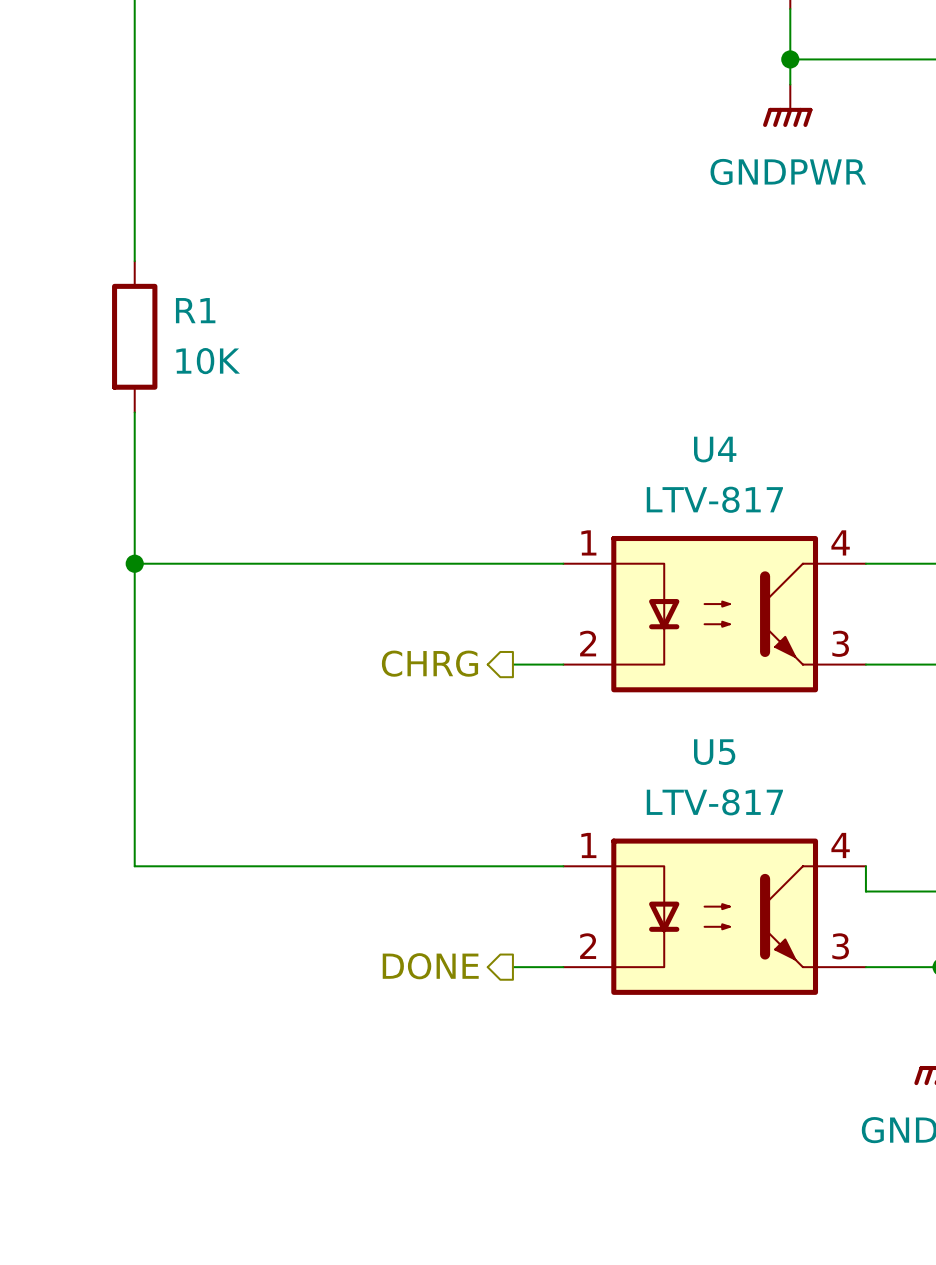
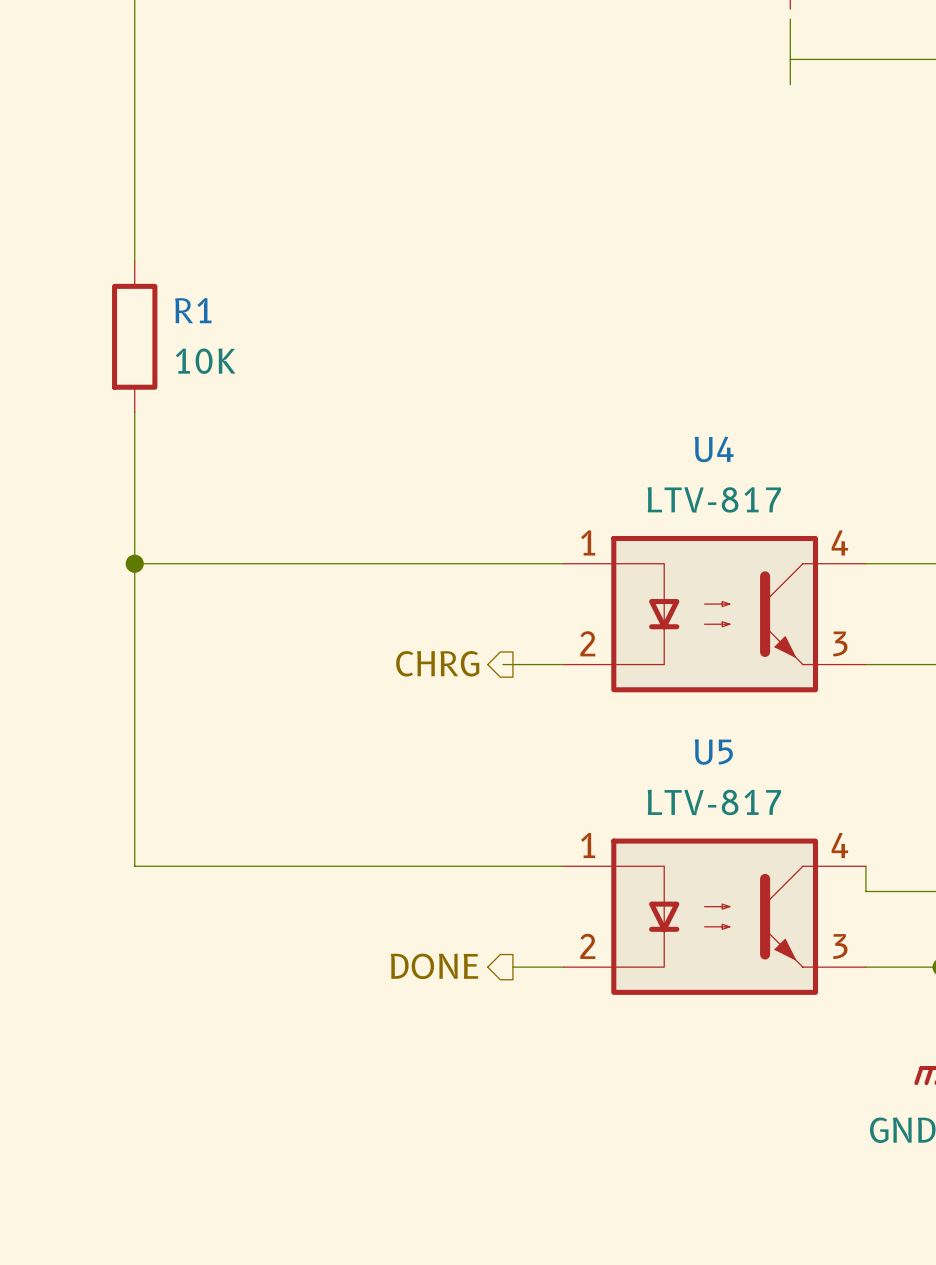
wire: (790, 9) (790, 19) -> none
junction: (790, 59) -> none
power symbol: GNDPWR (787, 105) -> none
wire: none -> (502, 664) (512, 664)

